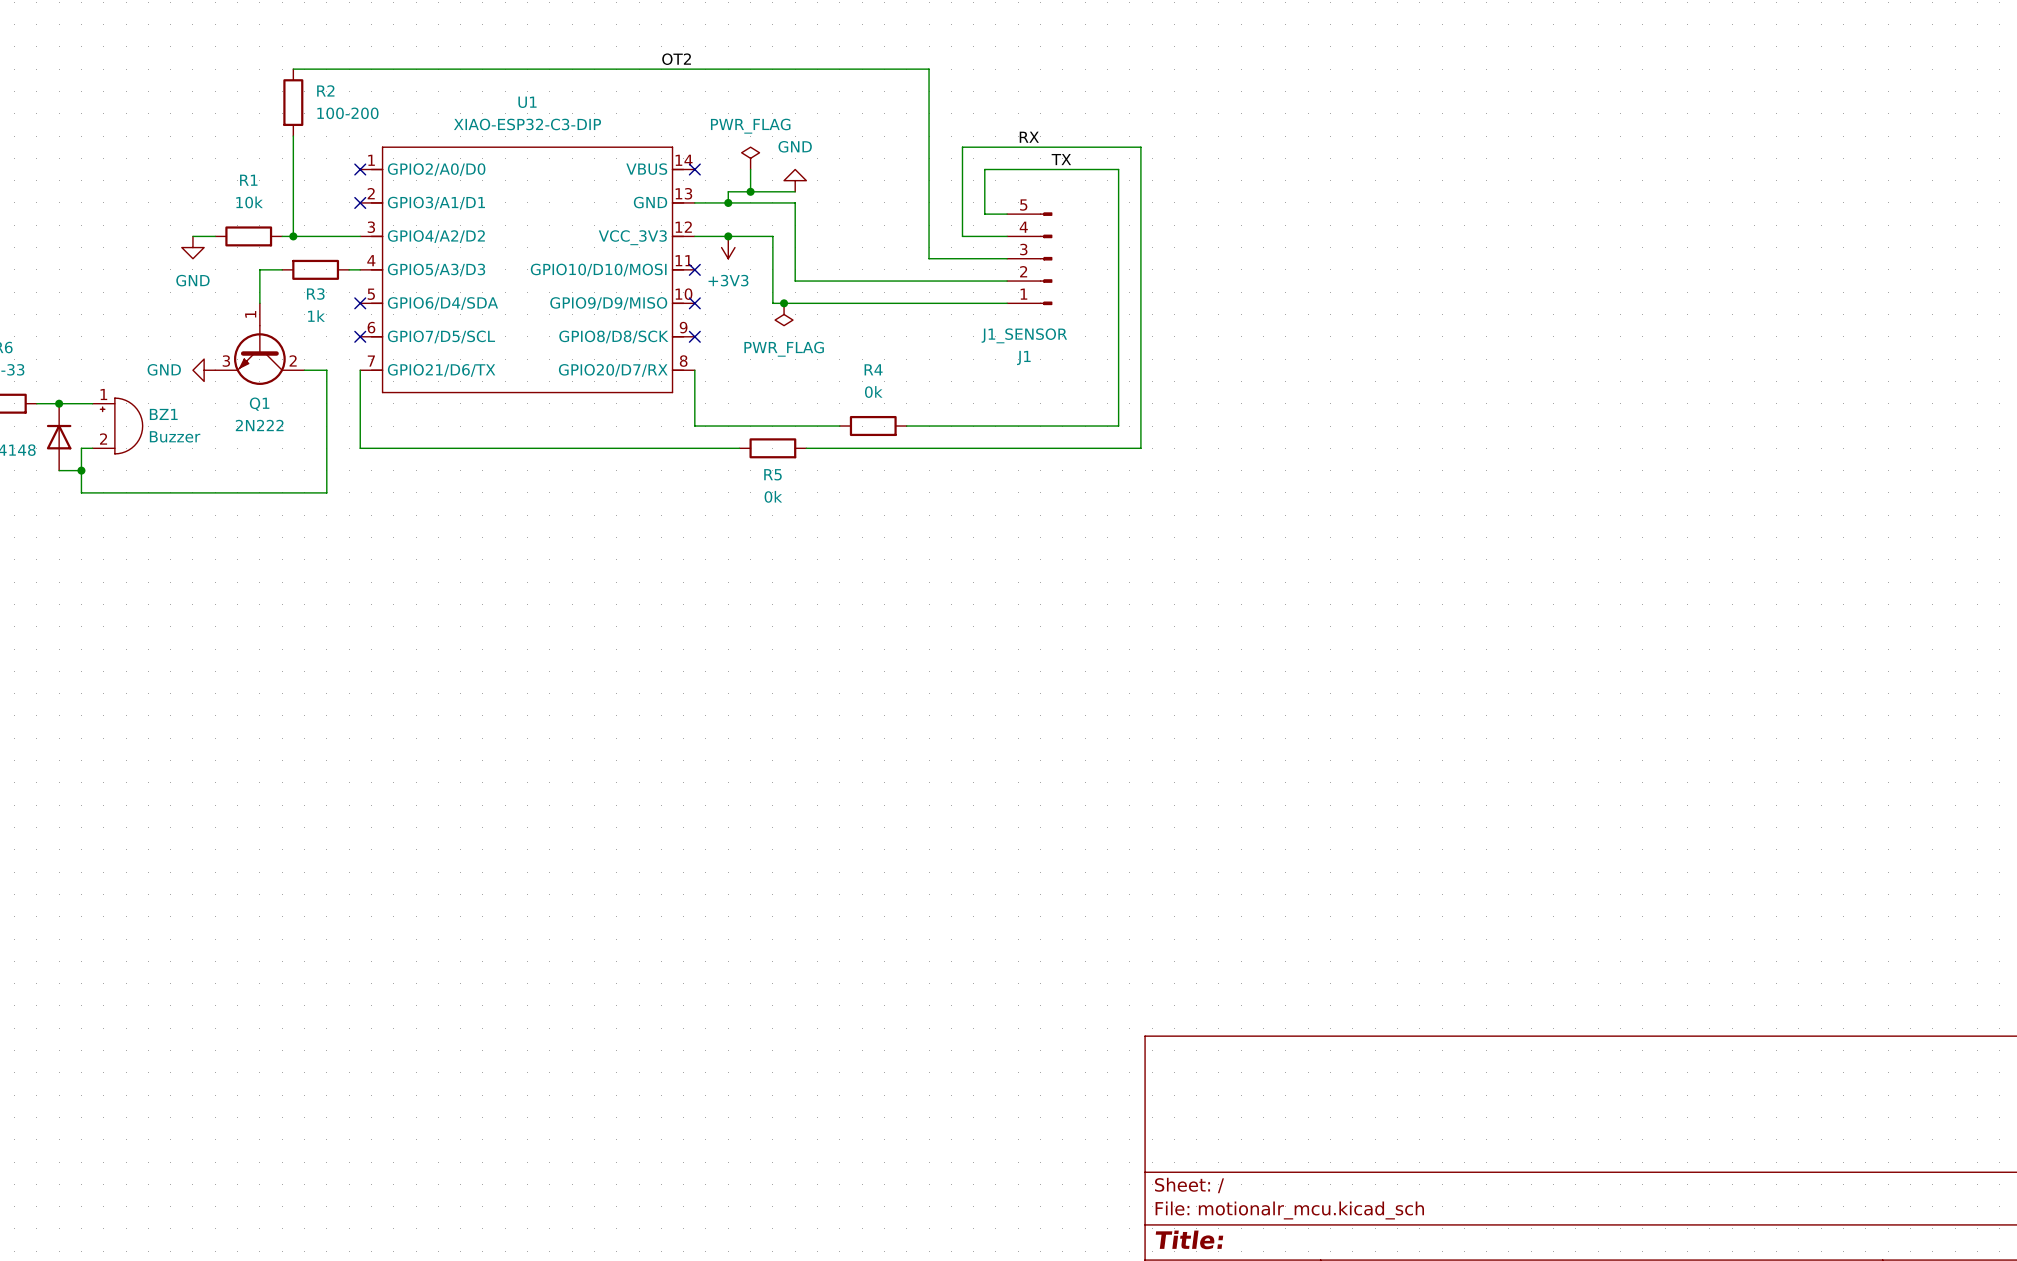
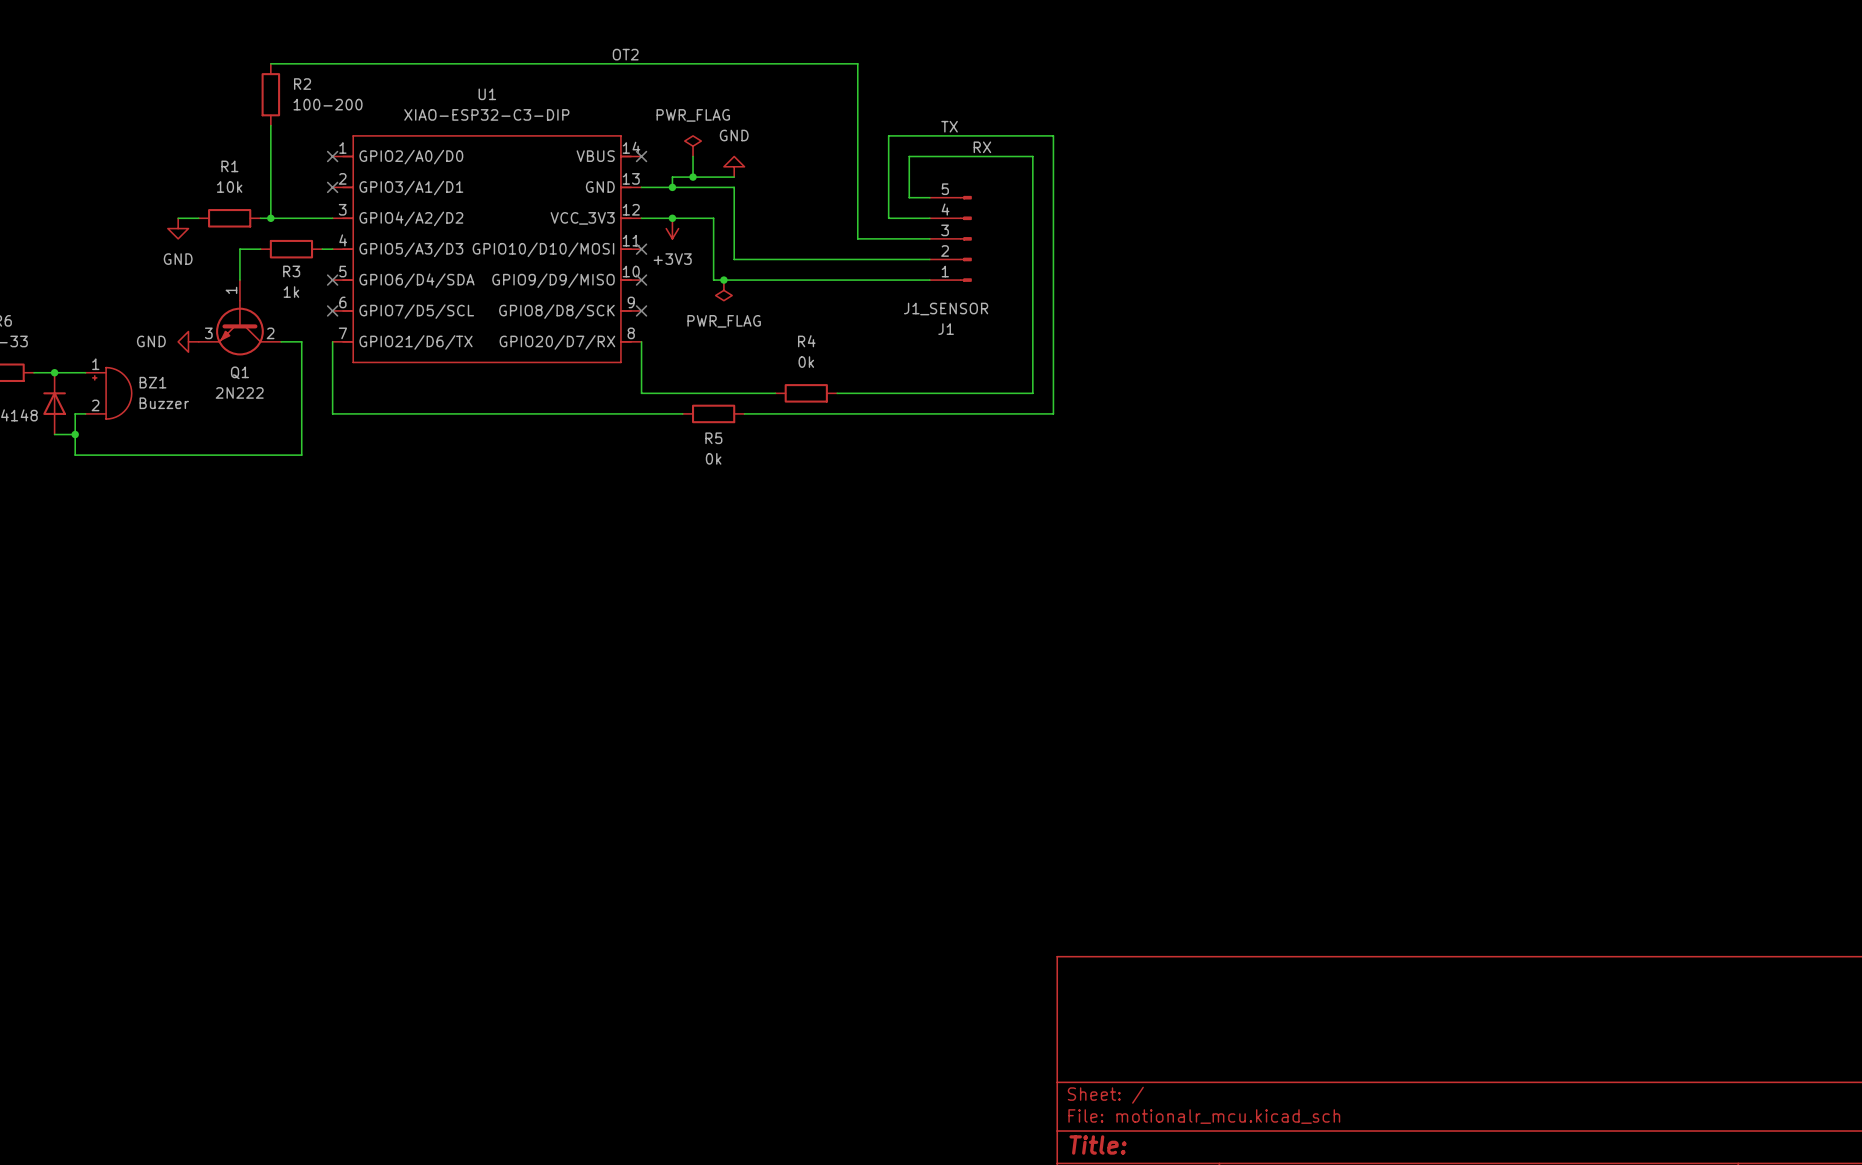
label: RX (1029, 137) -> TX (949, 126)
label: TX (1061, 159) -> RX (982, 147)

